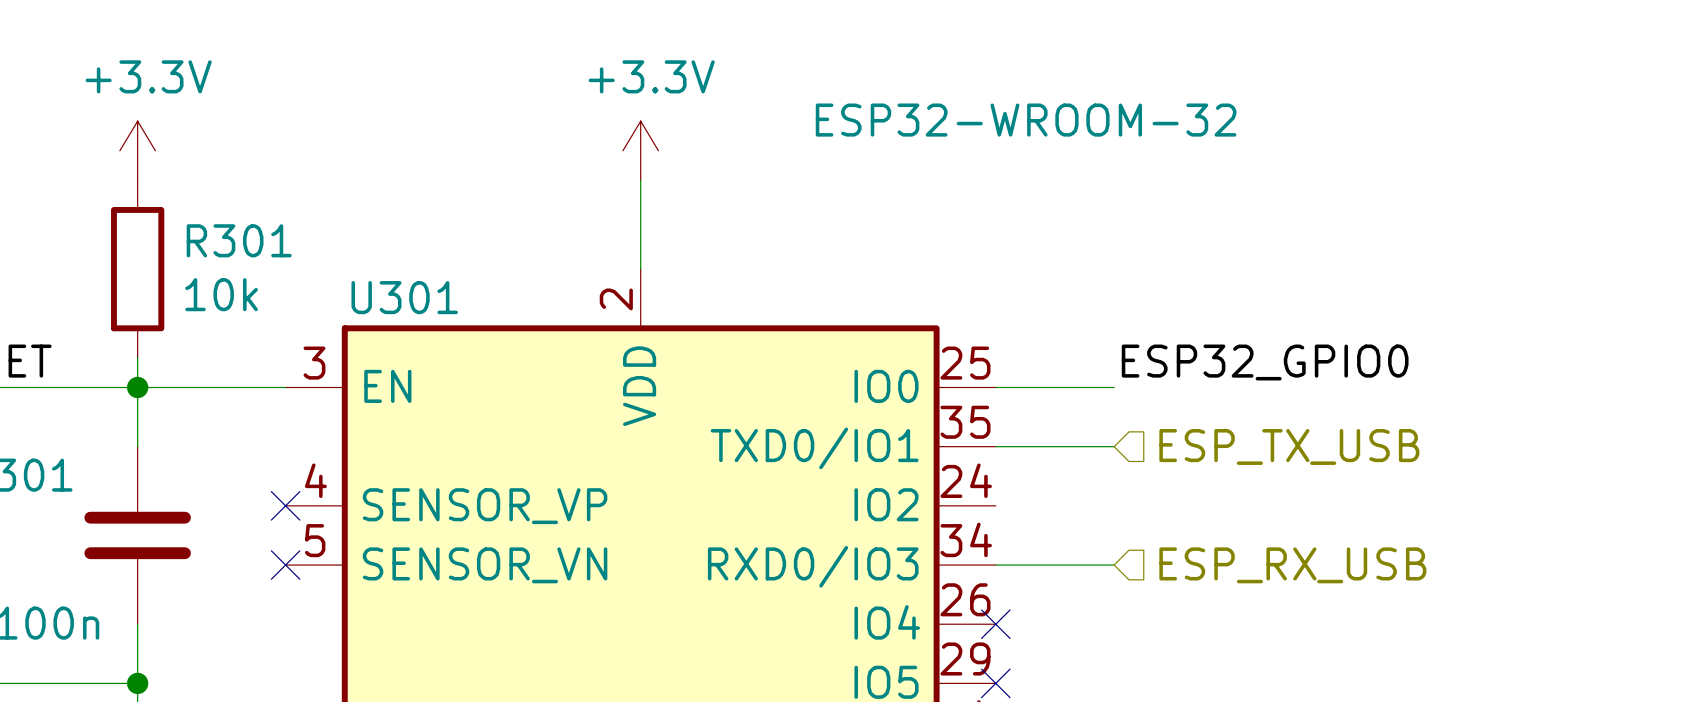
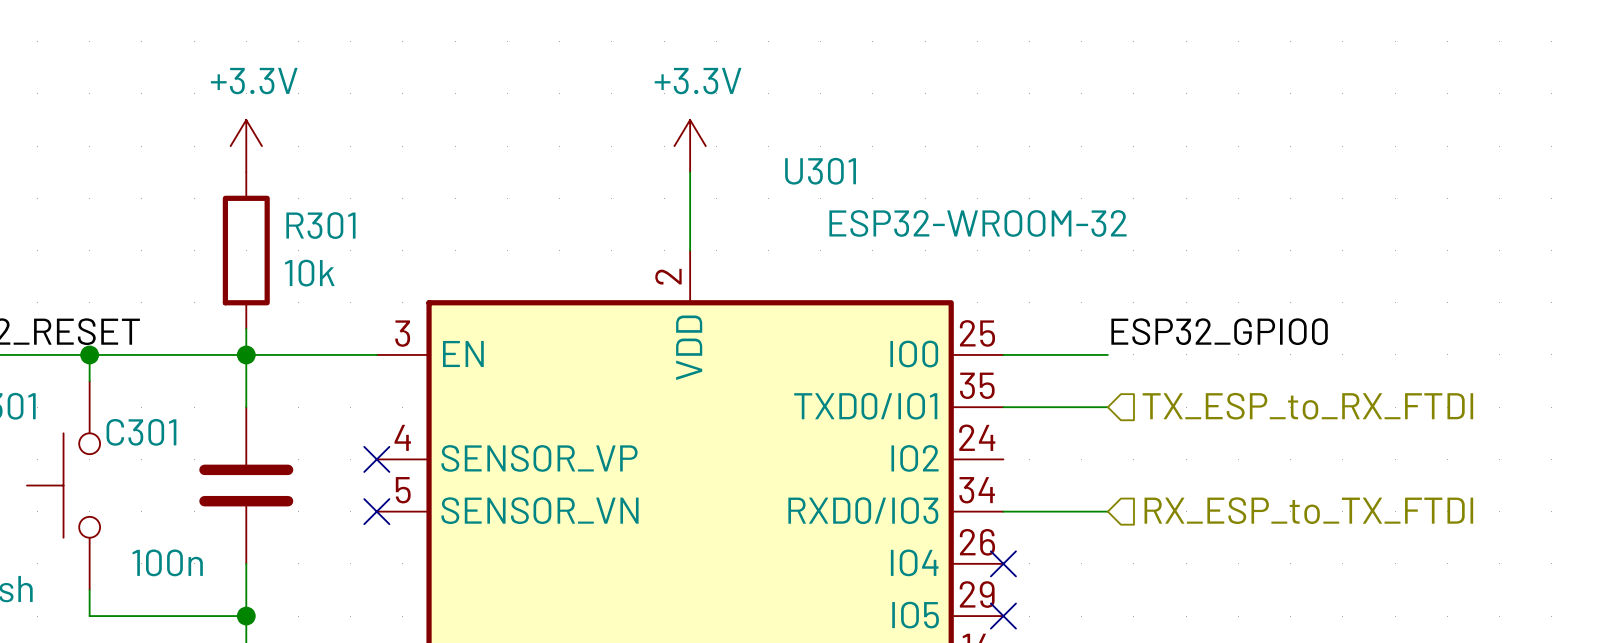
U301 value position: ESP32-WROOM-32 (1026, 120) -> ESP32-WROOM-32 (977, 223)
U301 name position: U301 (404, 297) -> U301 (820, 171)
hierarchical label: ESP_TX_USB (1289, 446) -> TX_ESP_to_RX_FTDI (1307, 406)
hierarchical label: ESP_RX_USB (1292, 565) -> RX_ESP_to_TX_FTDI (1308, 510)

